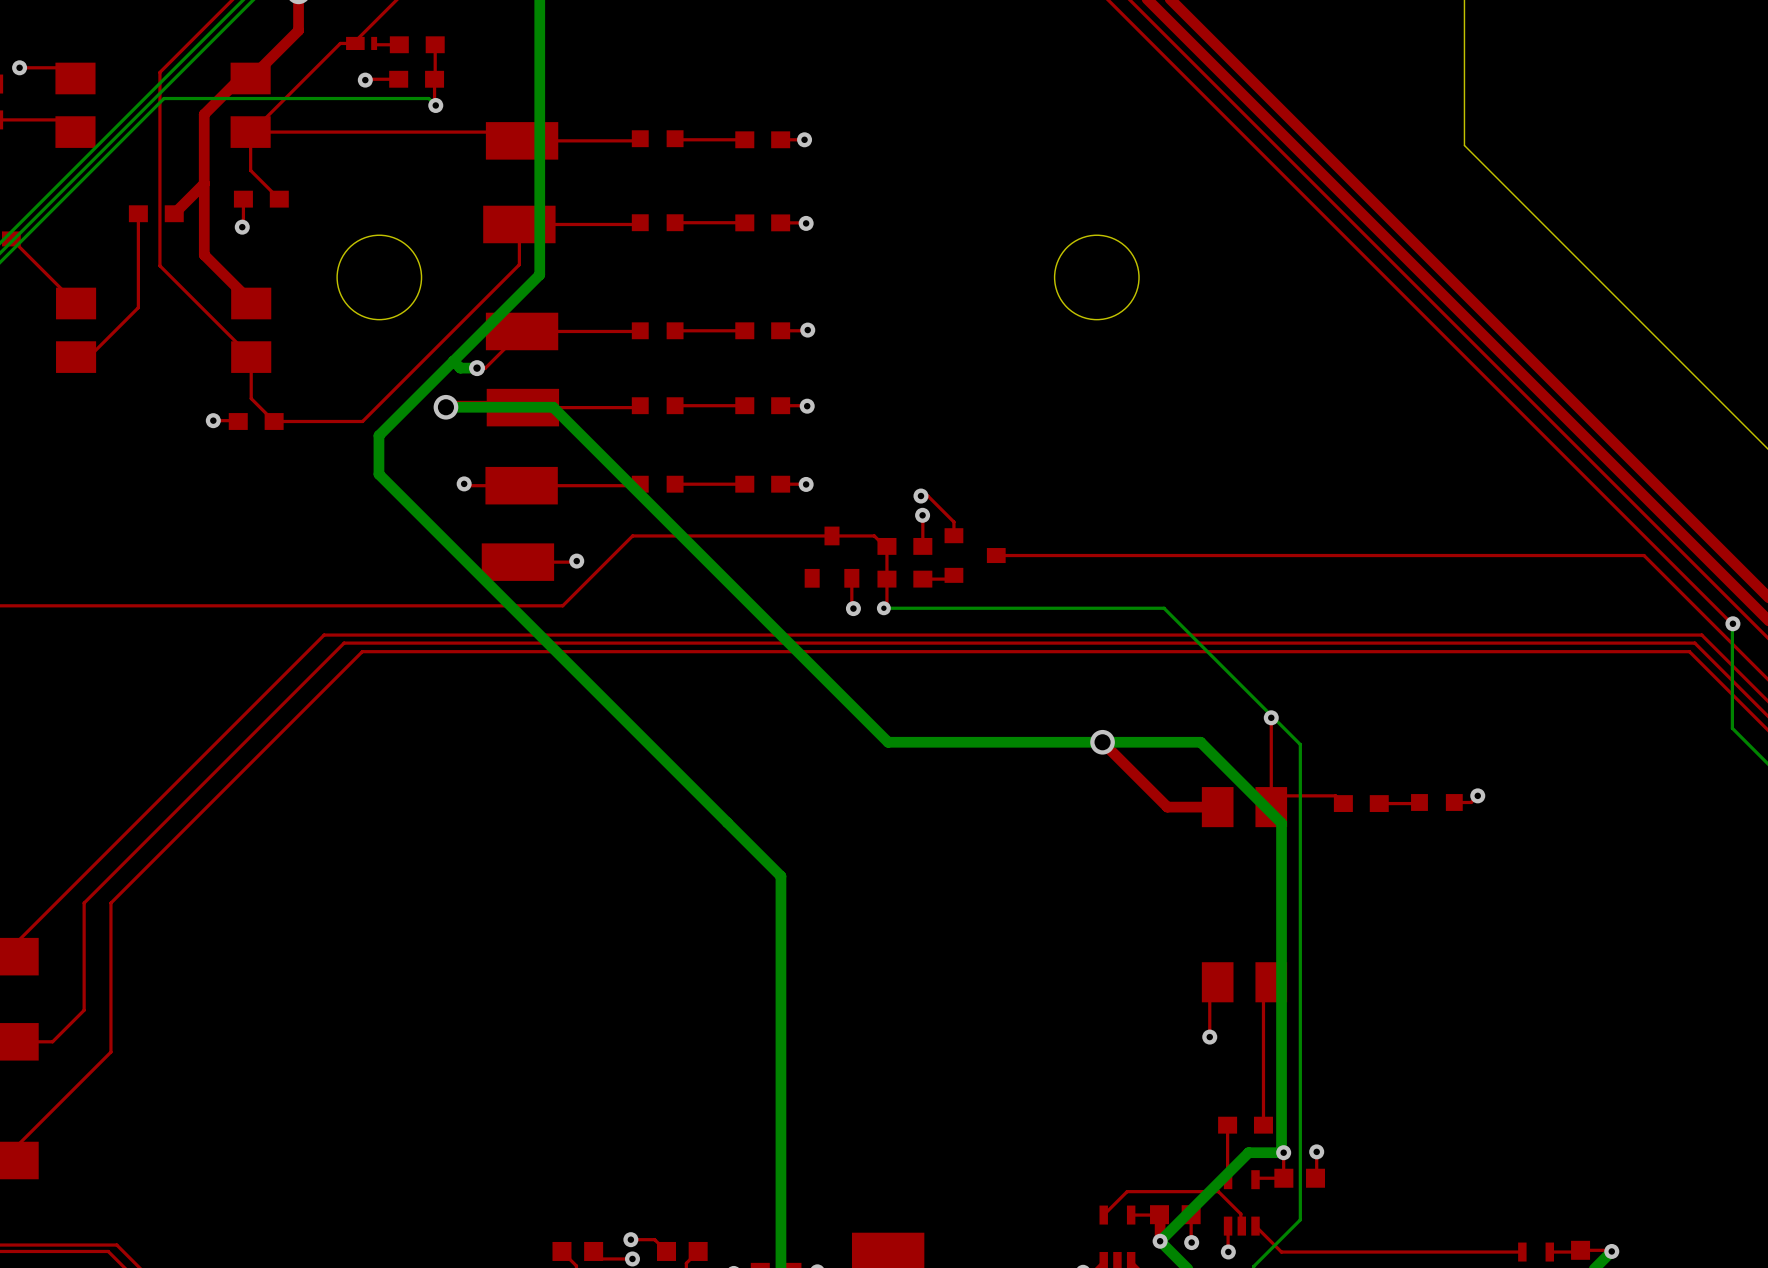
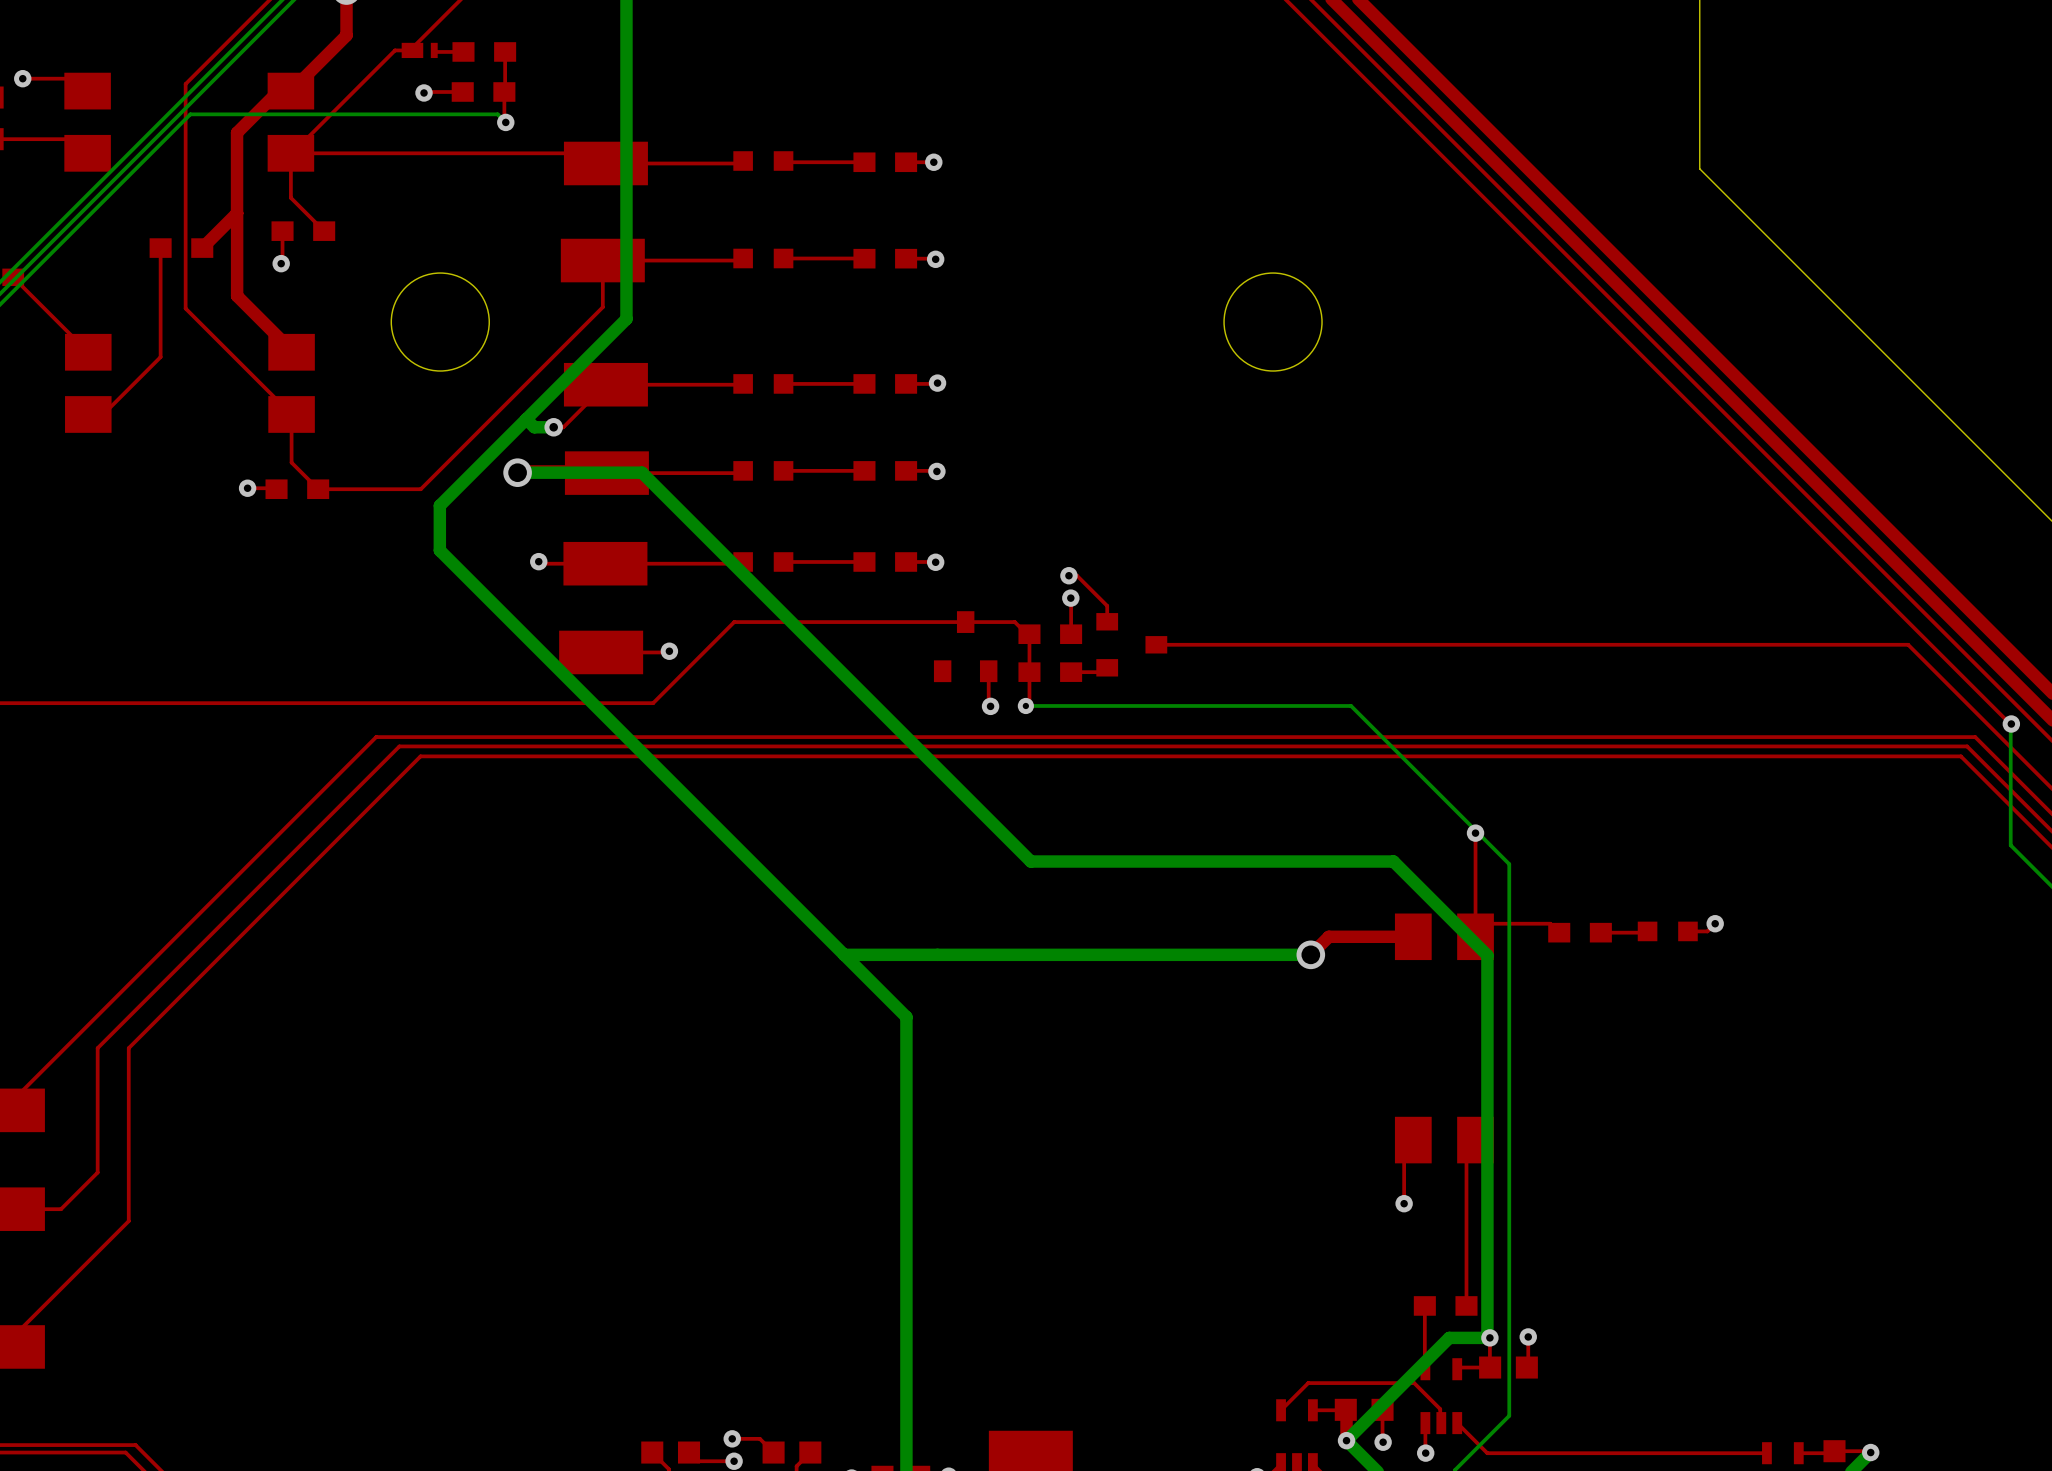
top track: (1102, 742) (1167, 807) -> (1310, 954) (1328, 936) (1354, 936)
via position: (1102, 742) -> (1310, 954)
bottom track: none -> (1310, 954) (844, 954)

